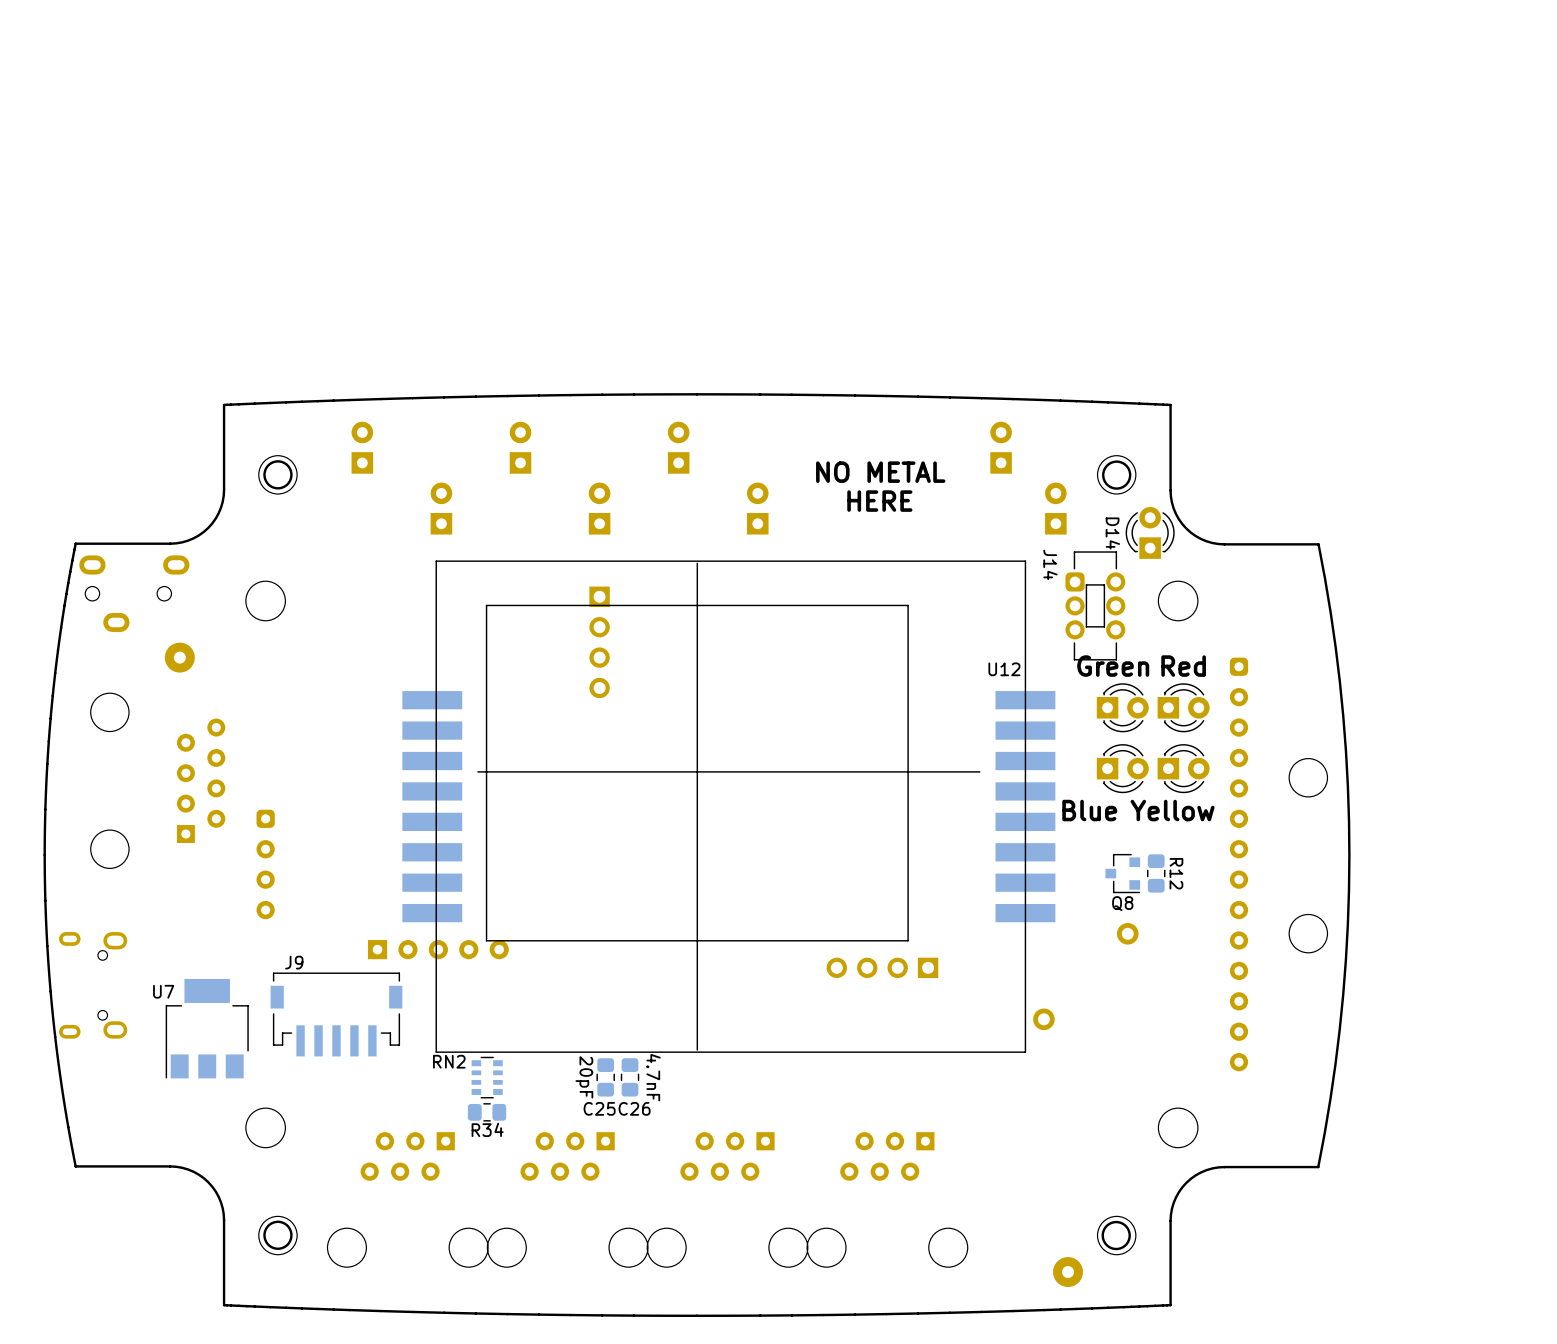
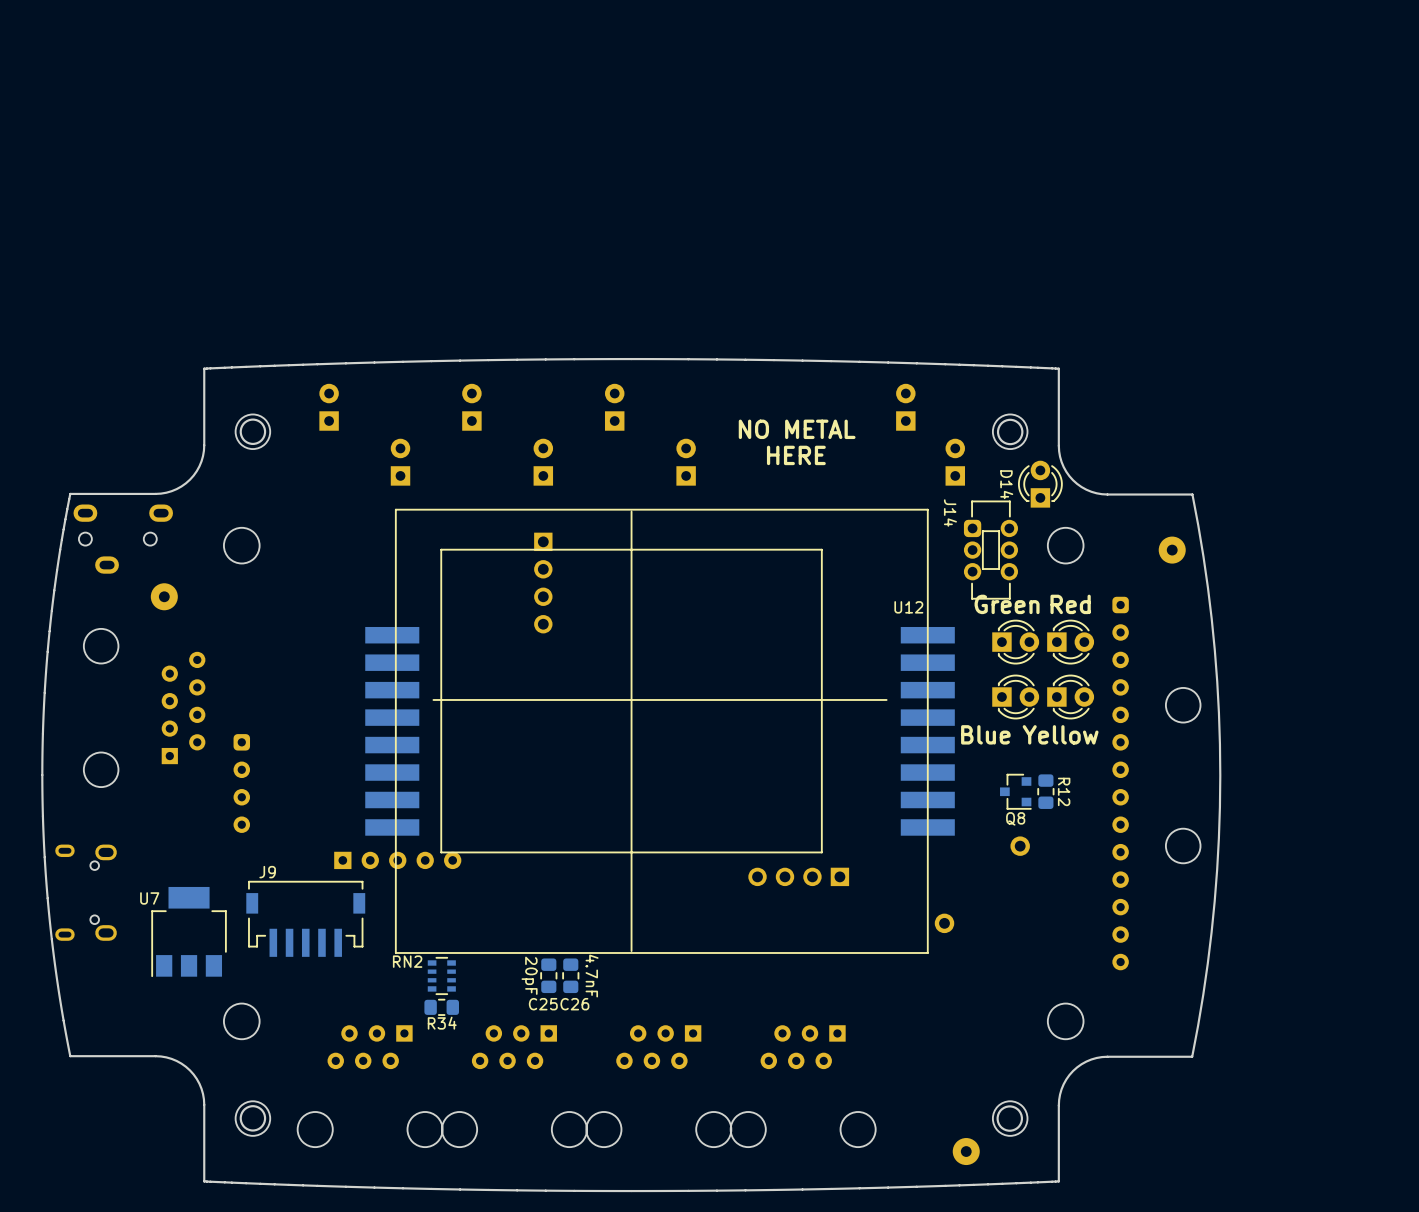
part: none -> (1172, 550)

